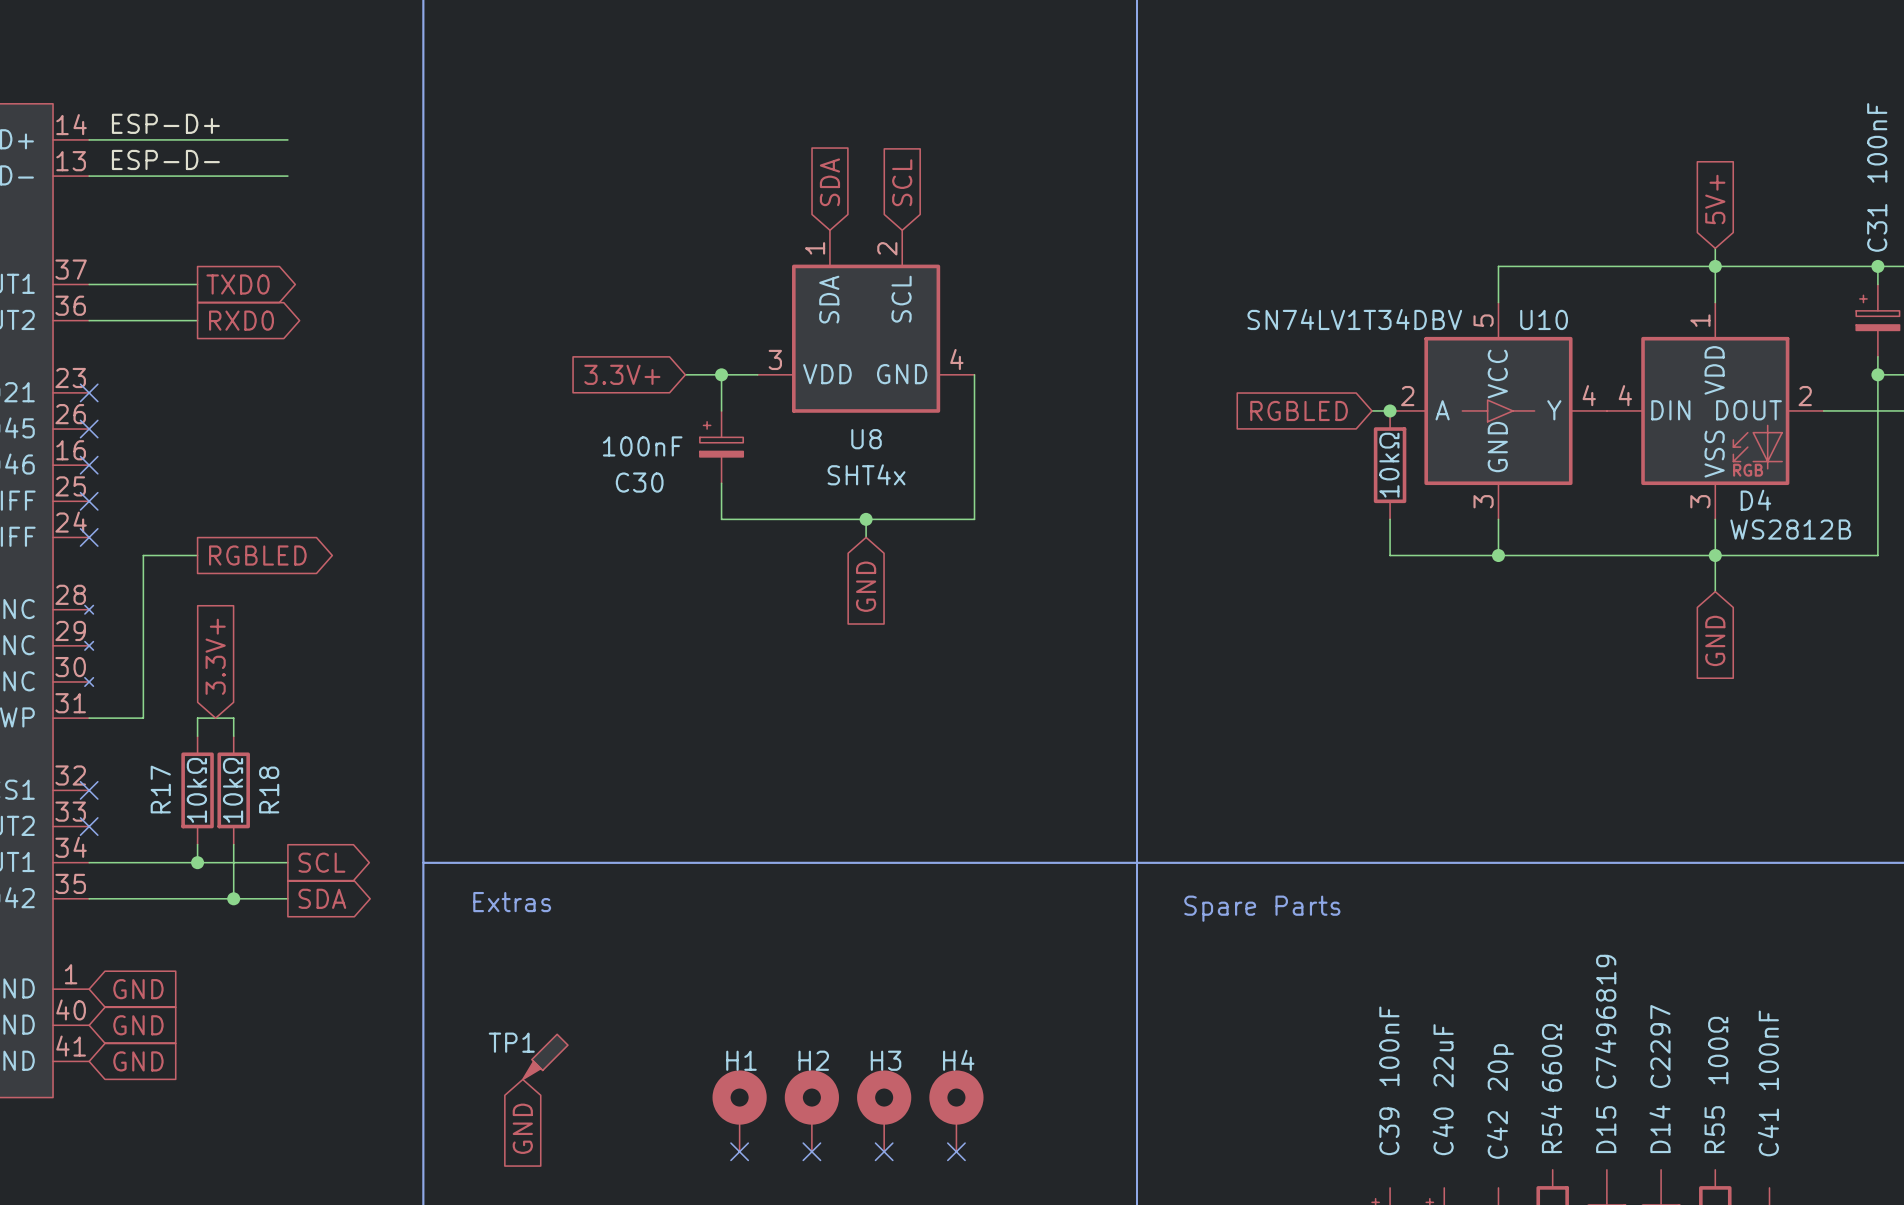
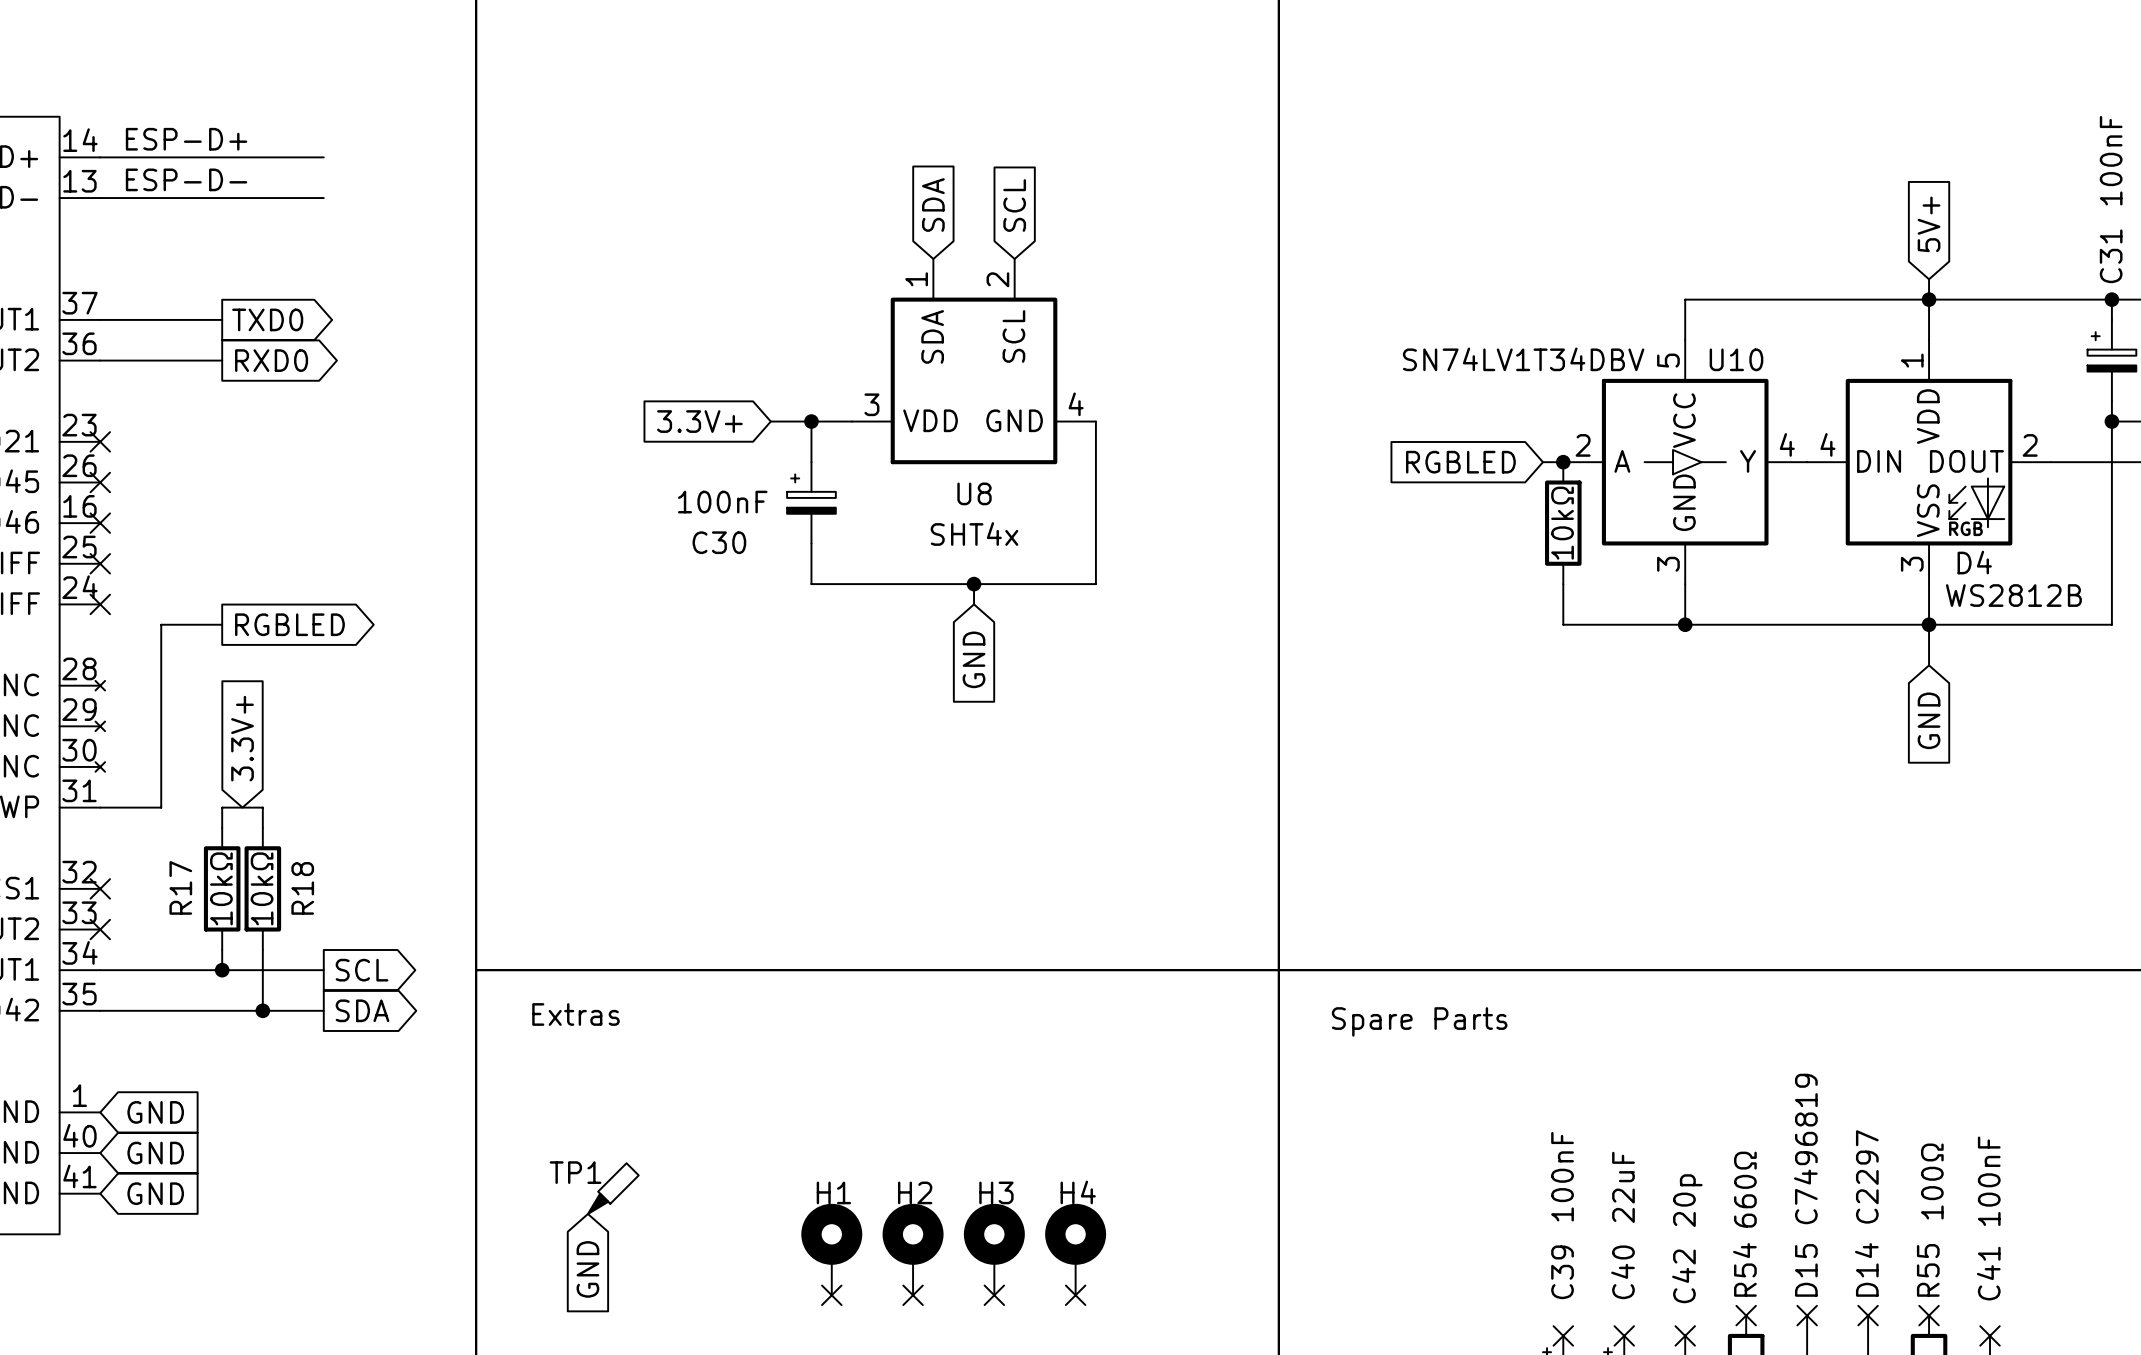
no-connect mark: none -> (1746, 1315)
no-connect mark: none -> (1807, 1315)
no-connect mark: none -> (1868, 1315)
no-connect mark: none -> (1929, 1315)
no-connect mark: none -> (1563, 1335)
no-connect mark: none -> (1624, 1335)
no-connect mark: none -> (1685, 1335)
no-connect mark: none -> (1990, 1335)

